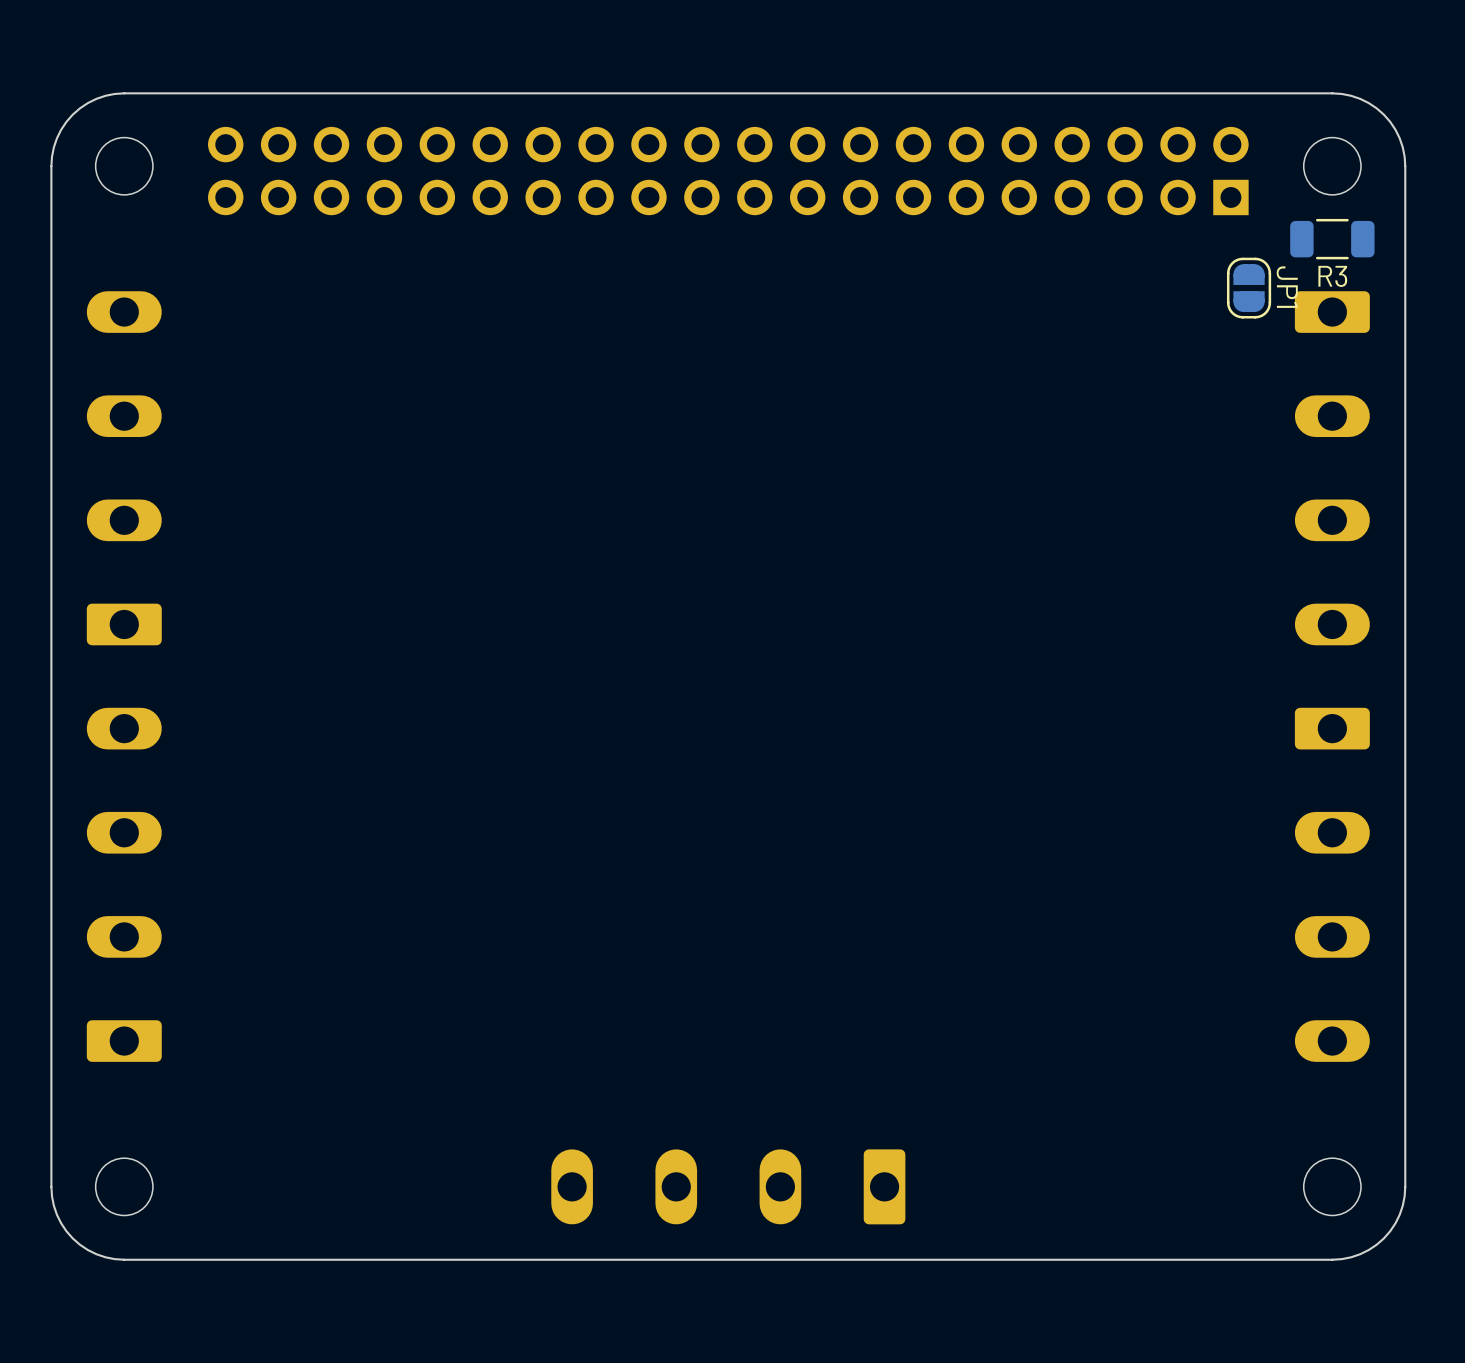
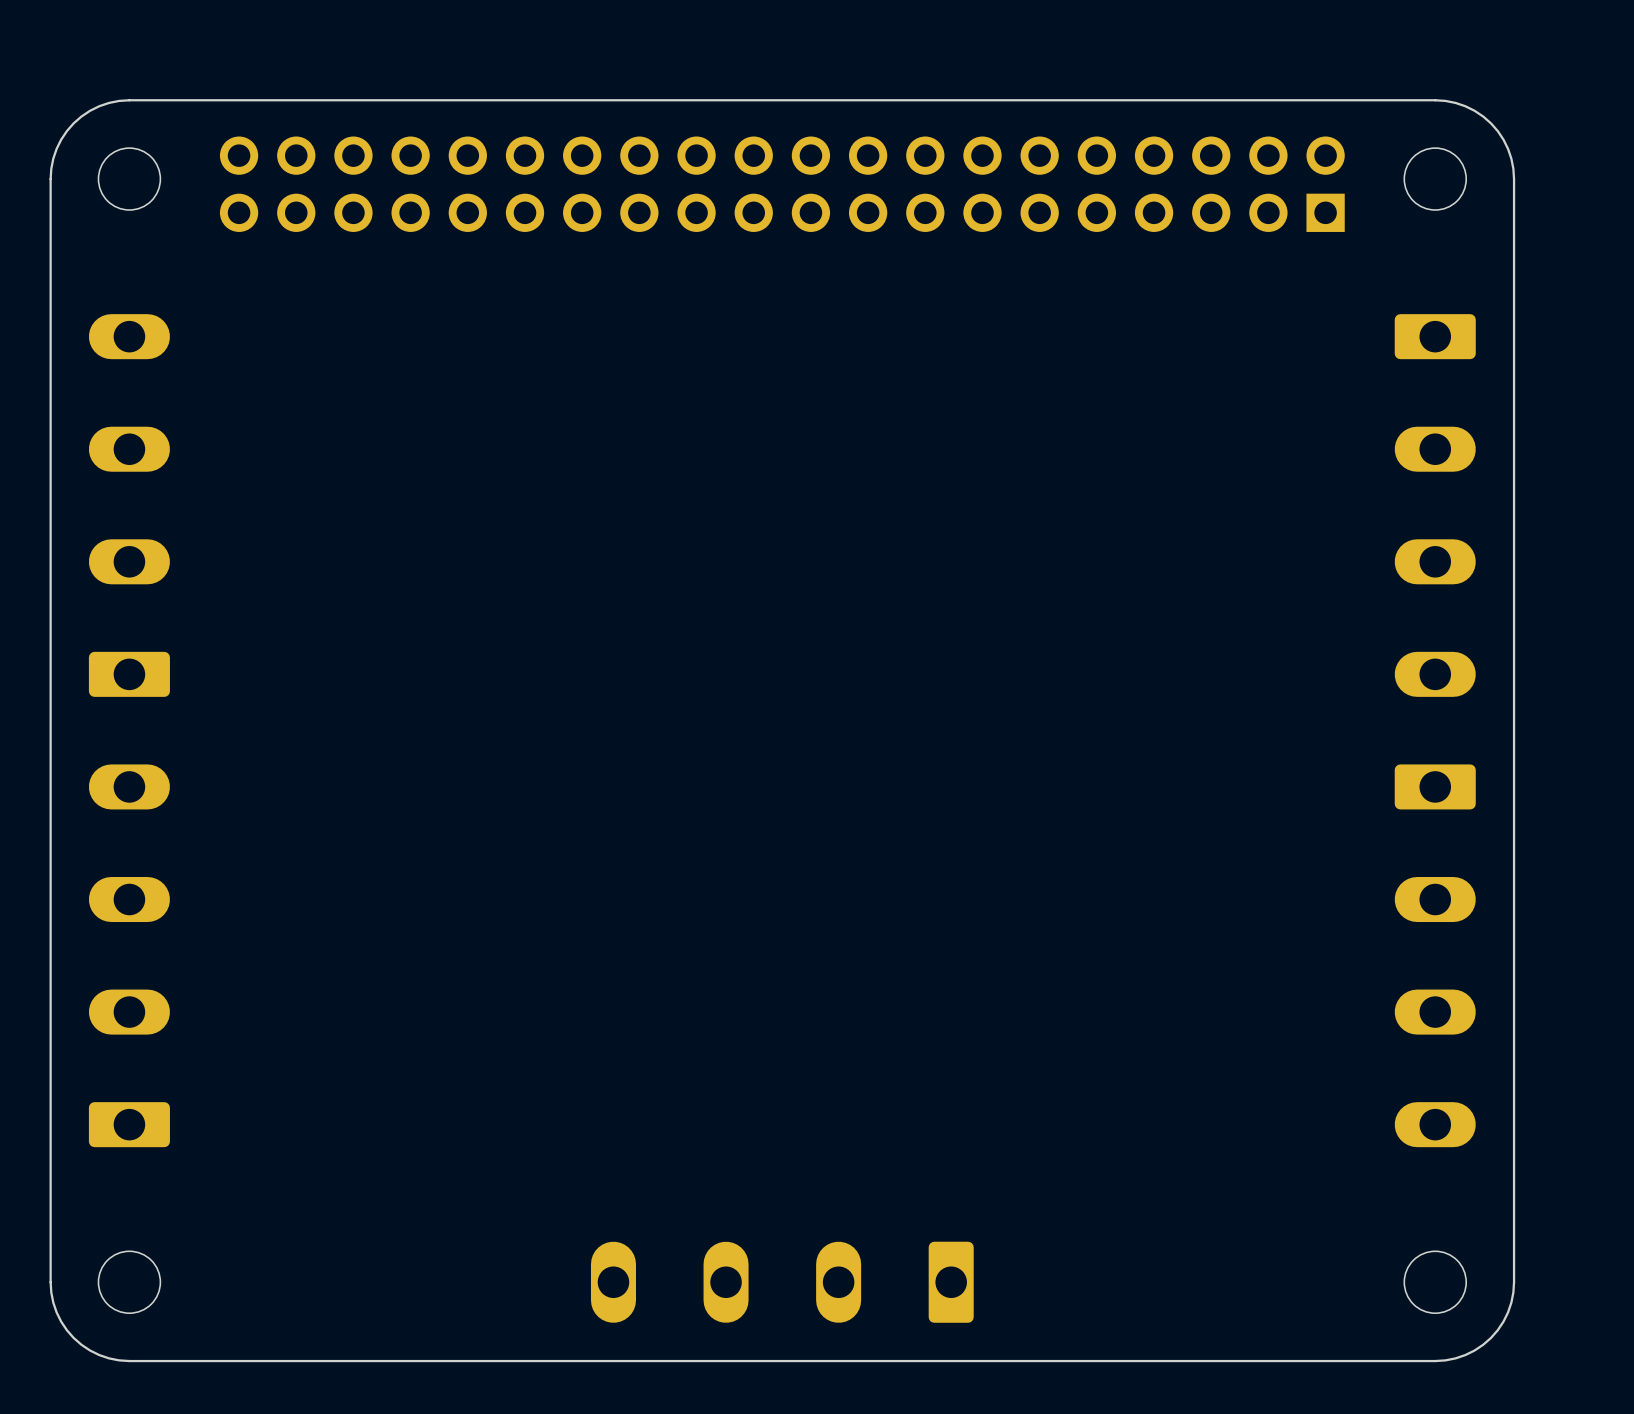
R3: (1332, 239) -> none
JP1: (1249, 288) -> none

